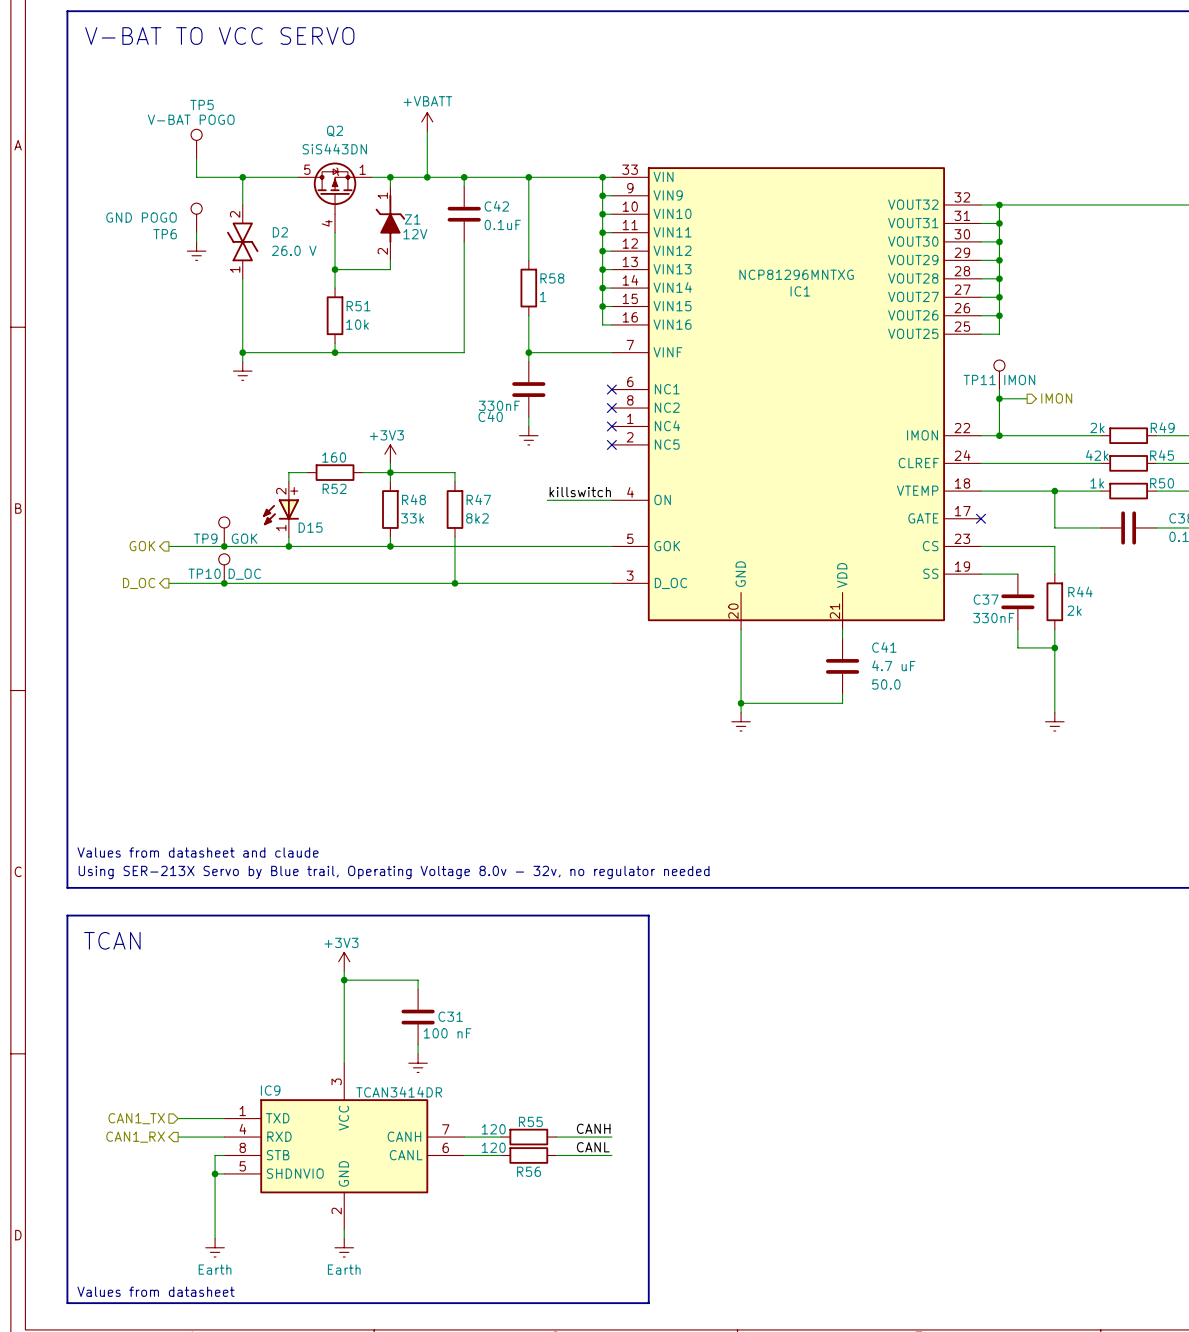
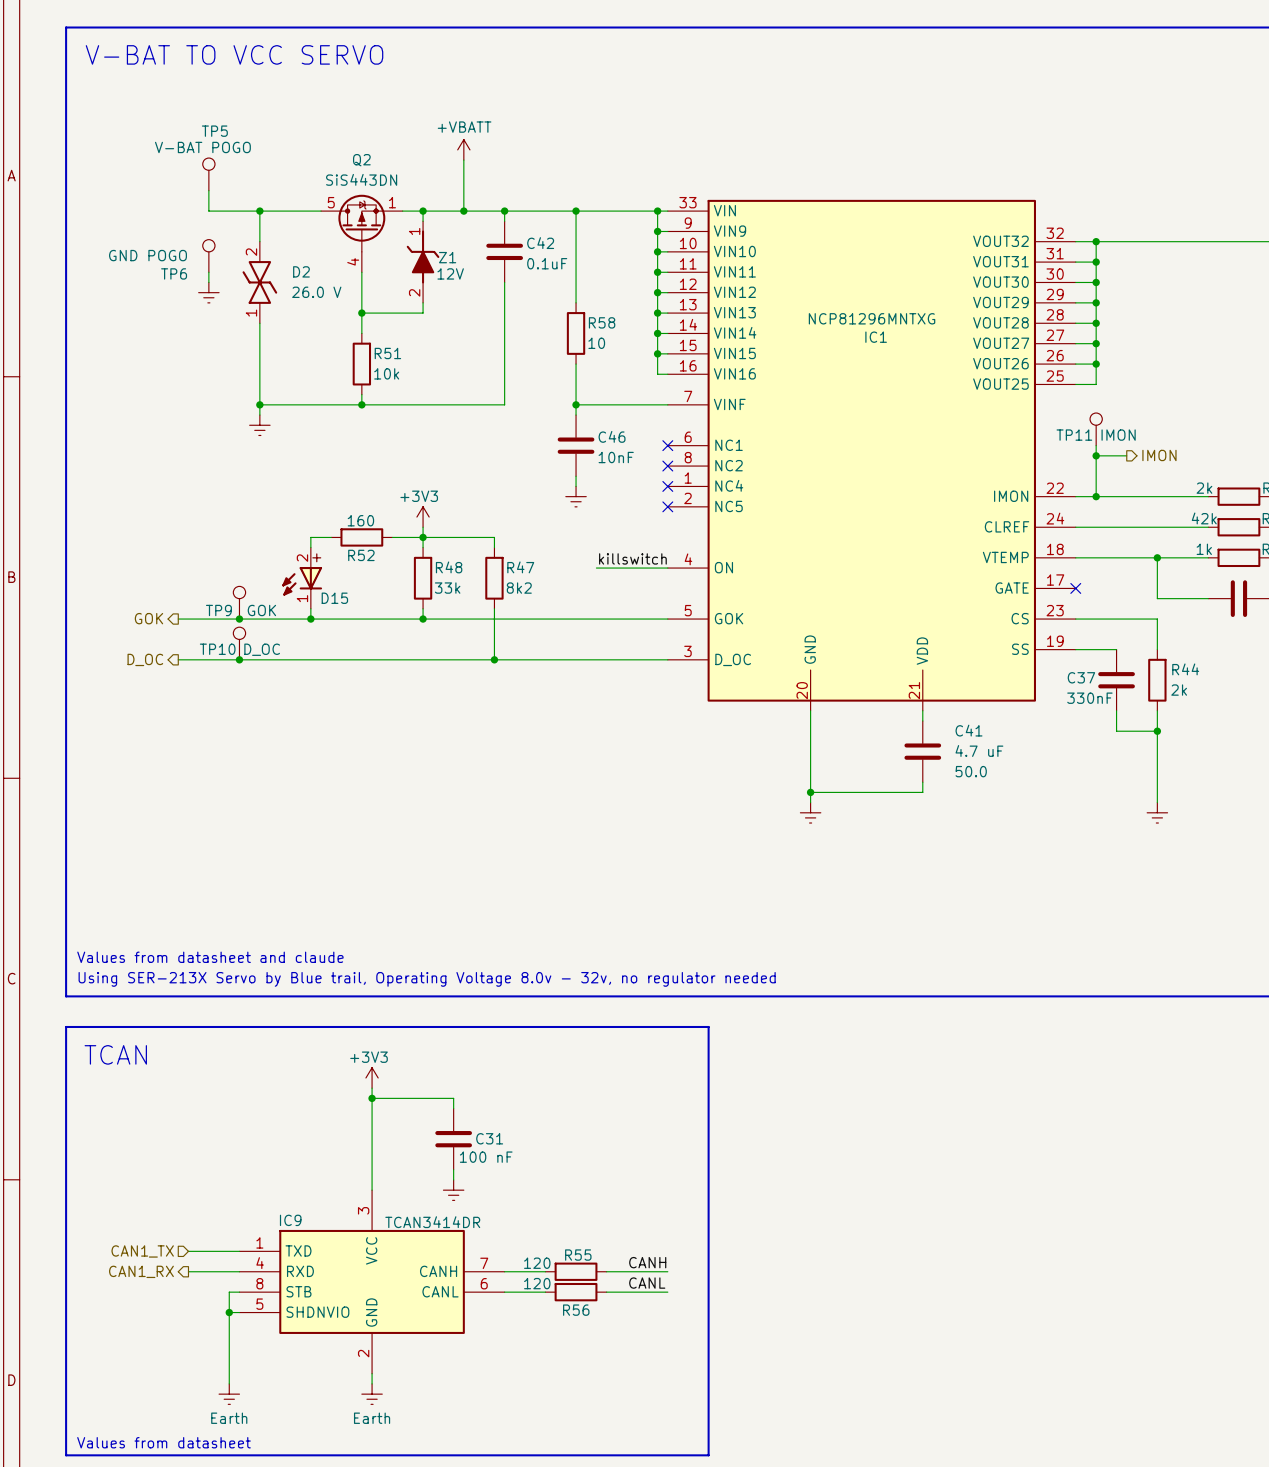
R58 value: 1 (543, 296) -> 10 (596, 343)
C40 value: 330nF (499, 405) -> 10nF (616, 457)
C40 name: C40 (490, 416) -> C46 (612, 436)

